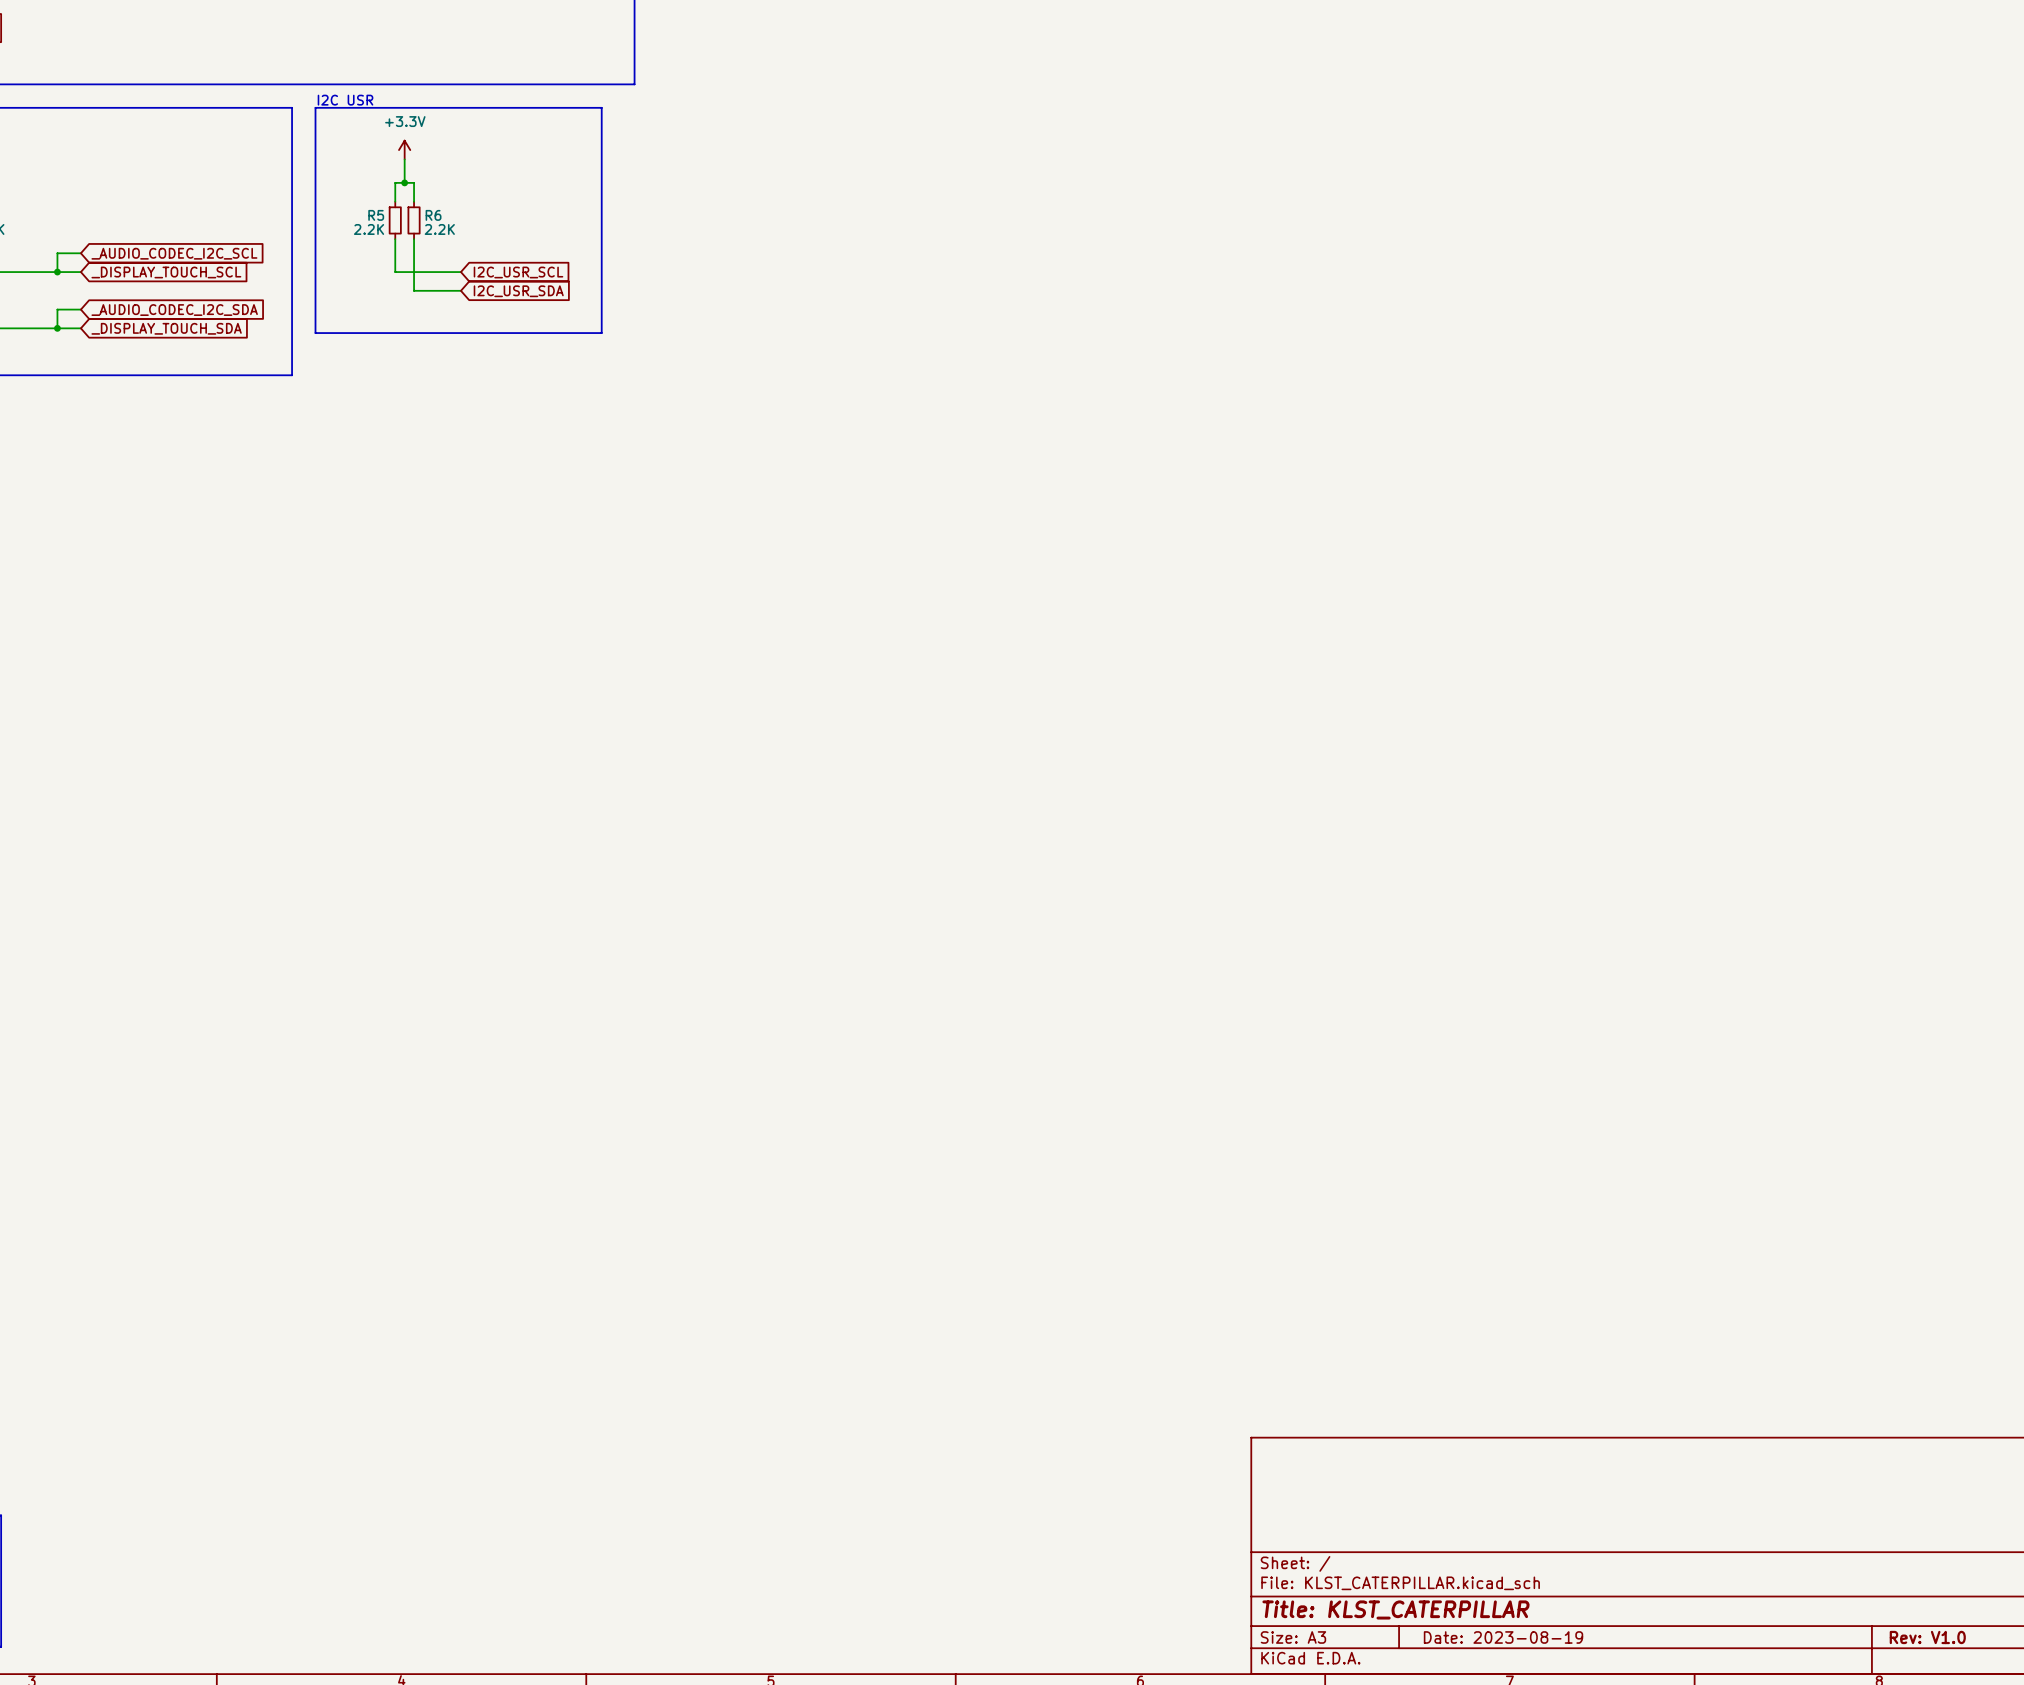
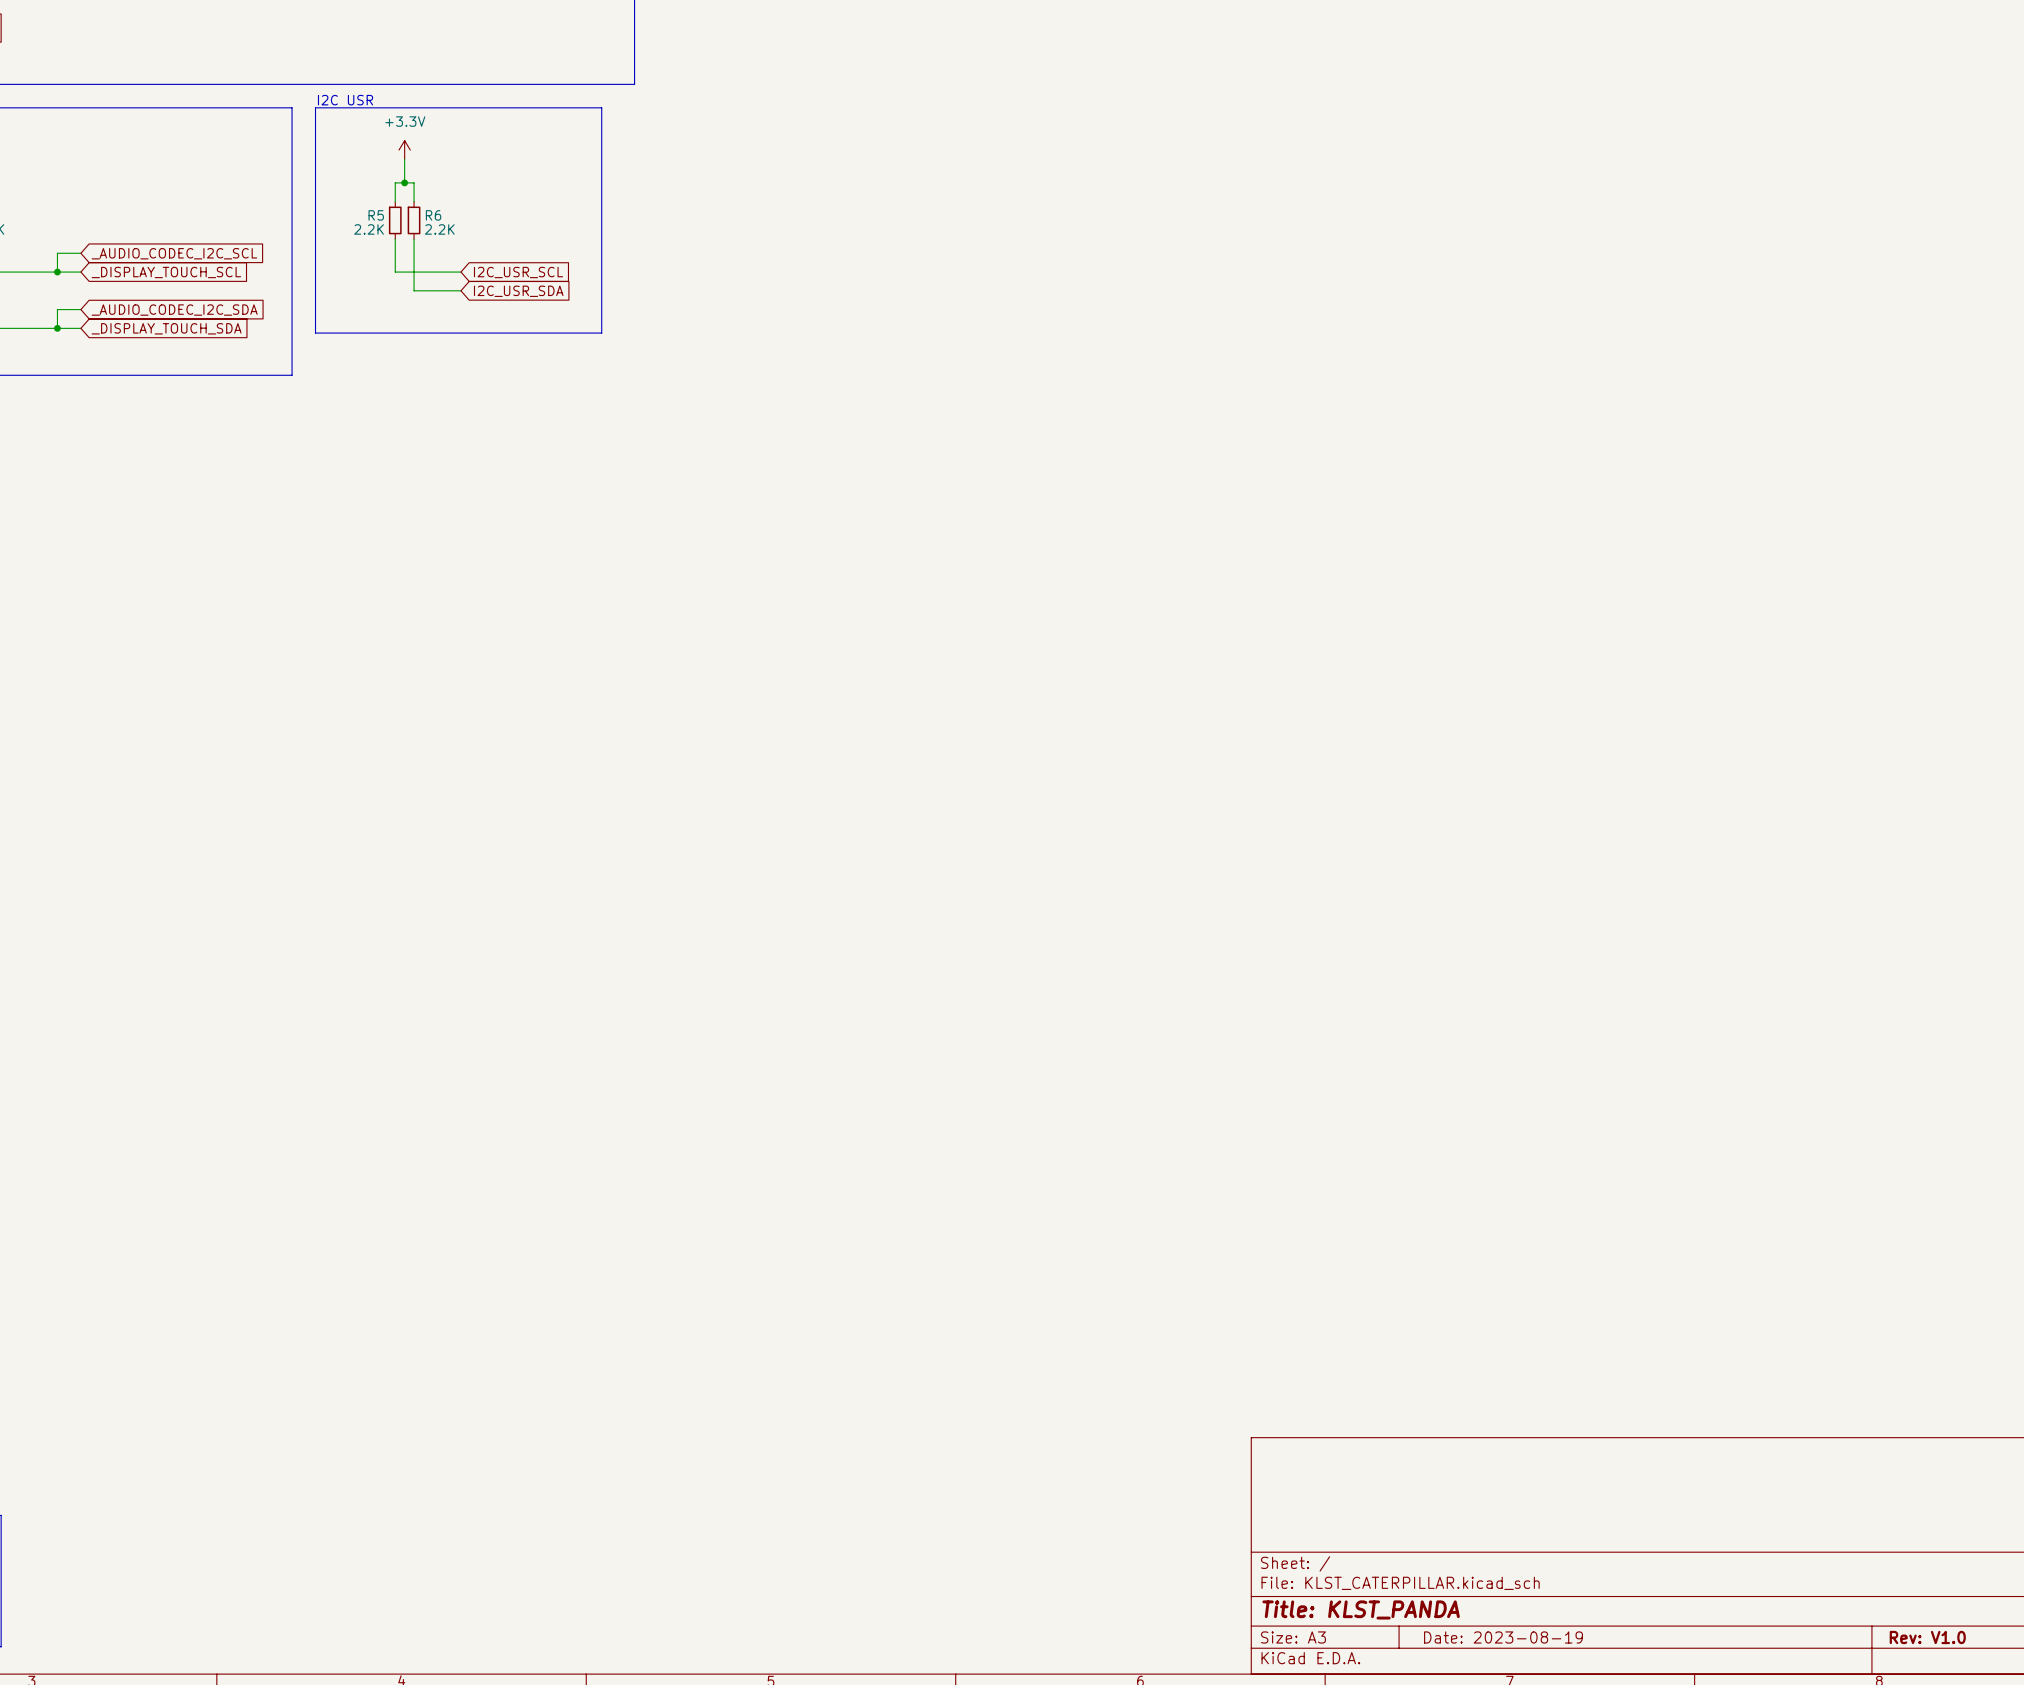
title block: Title: KLST_CATERPILLAR (1395, 1609) -> Title: KLST_PANDA (1361, 1609)

